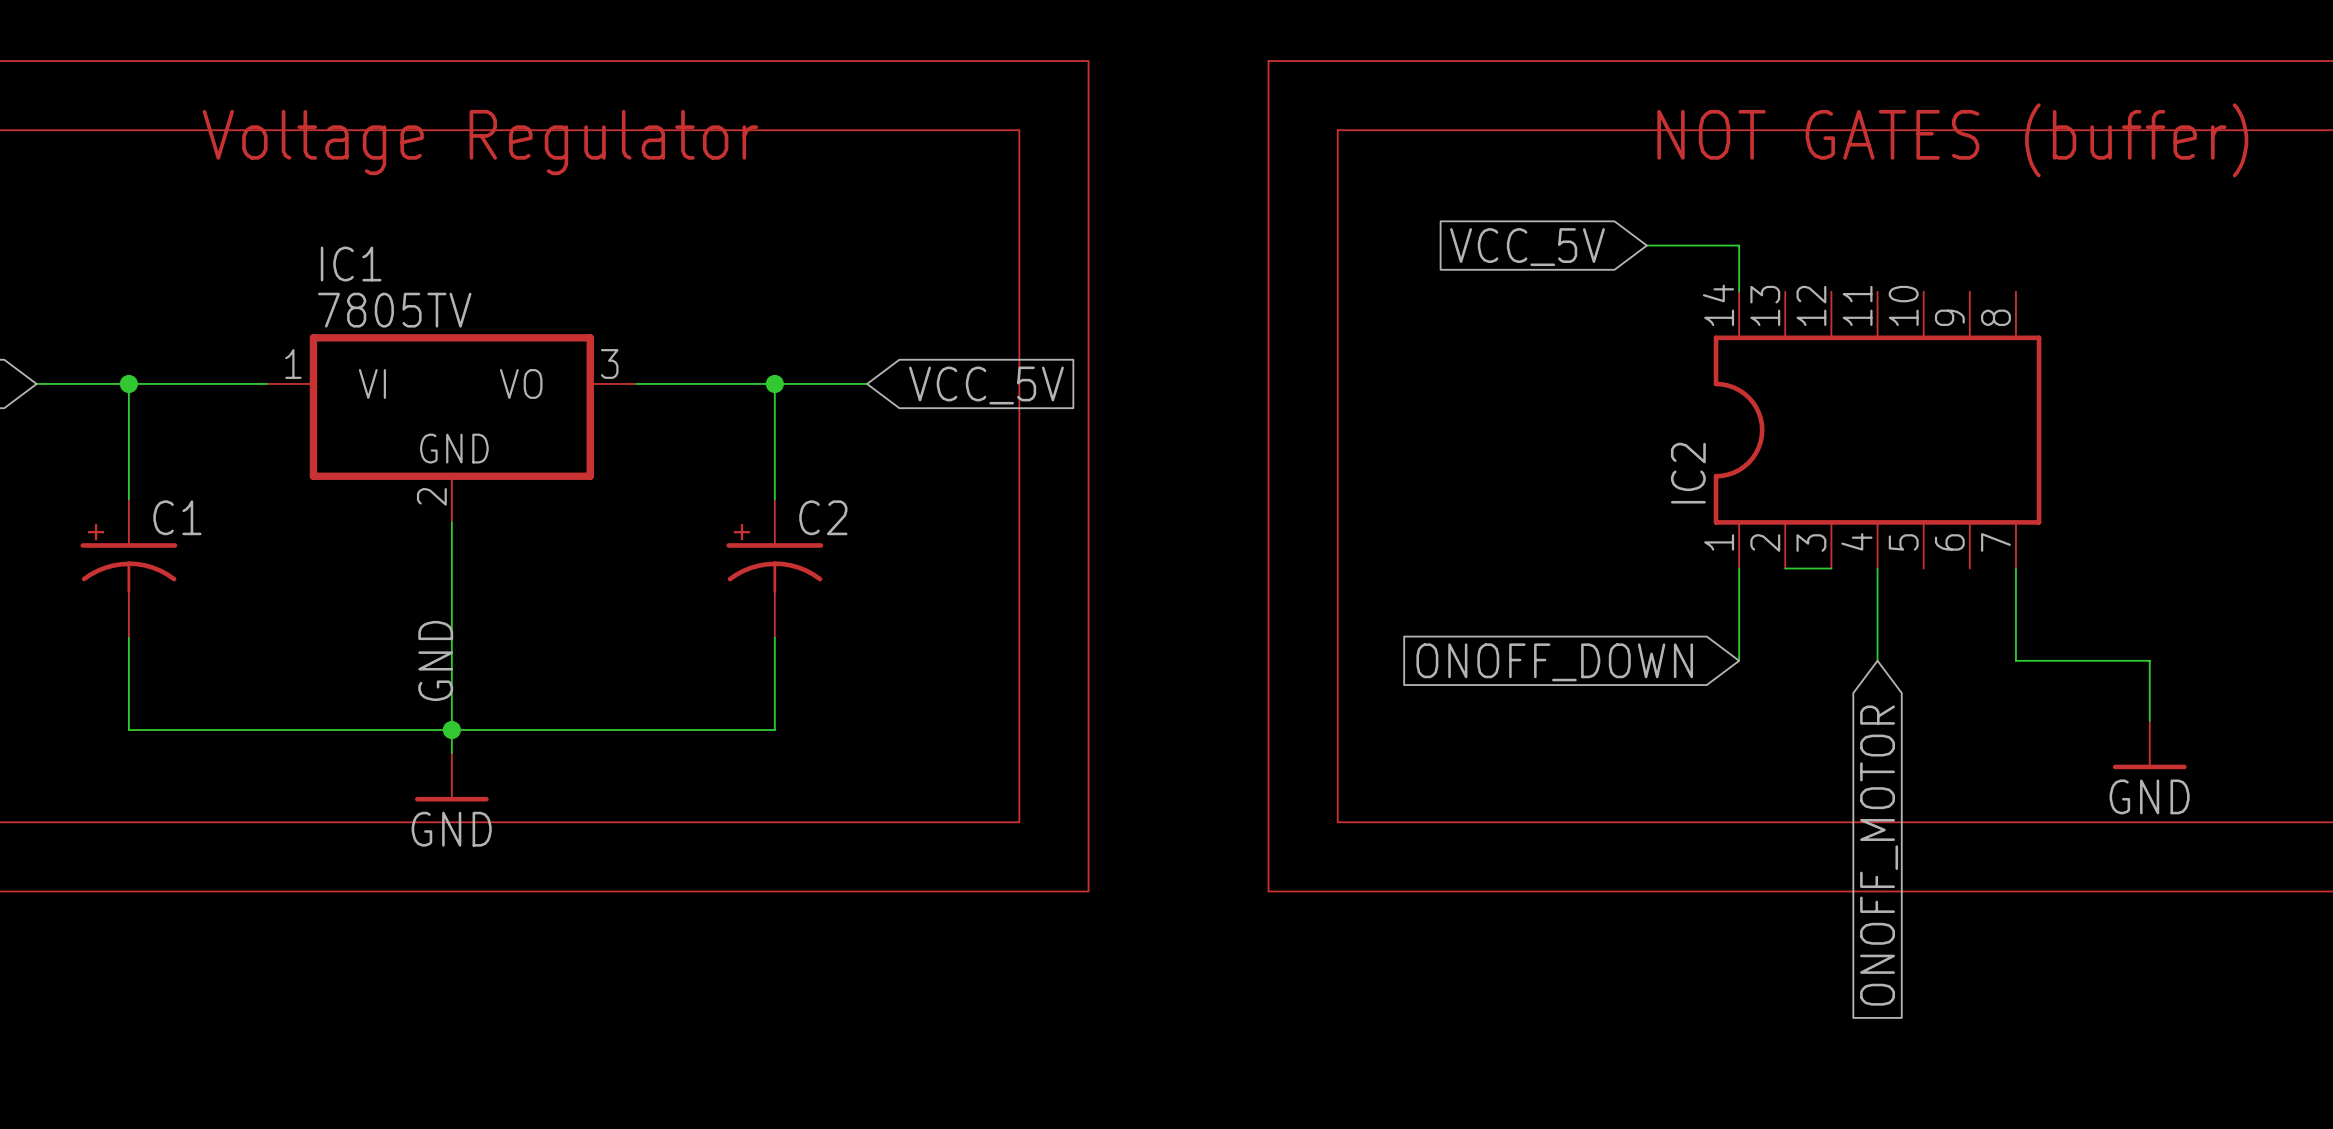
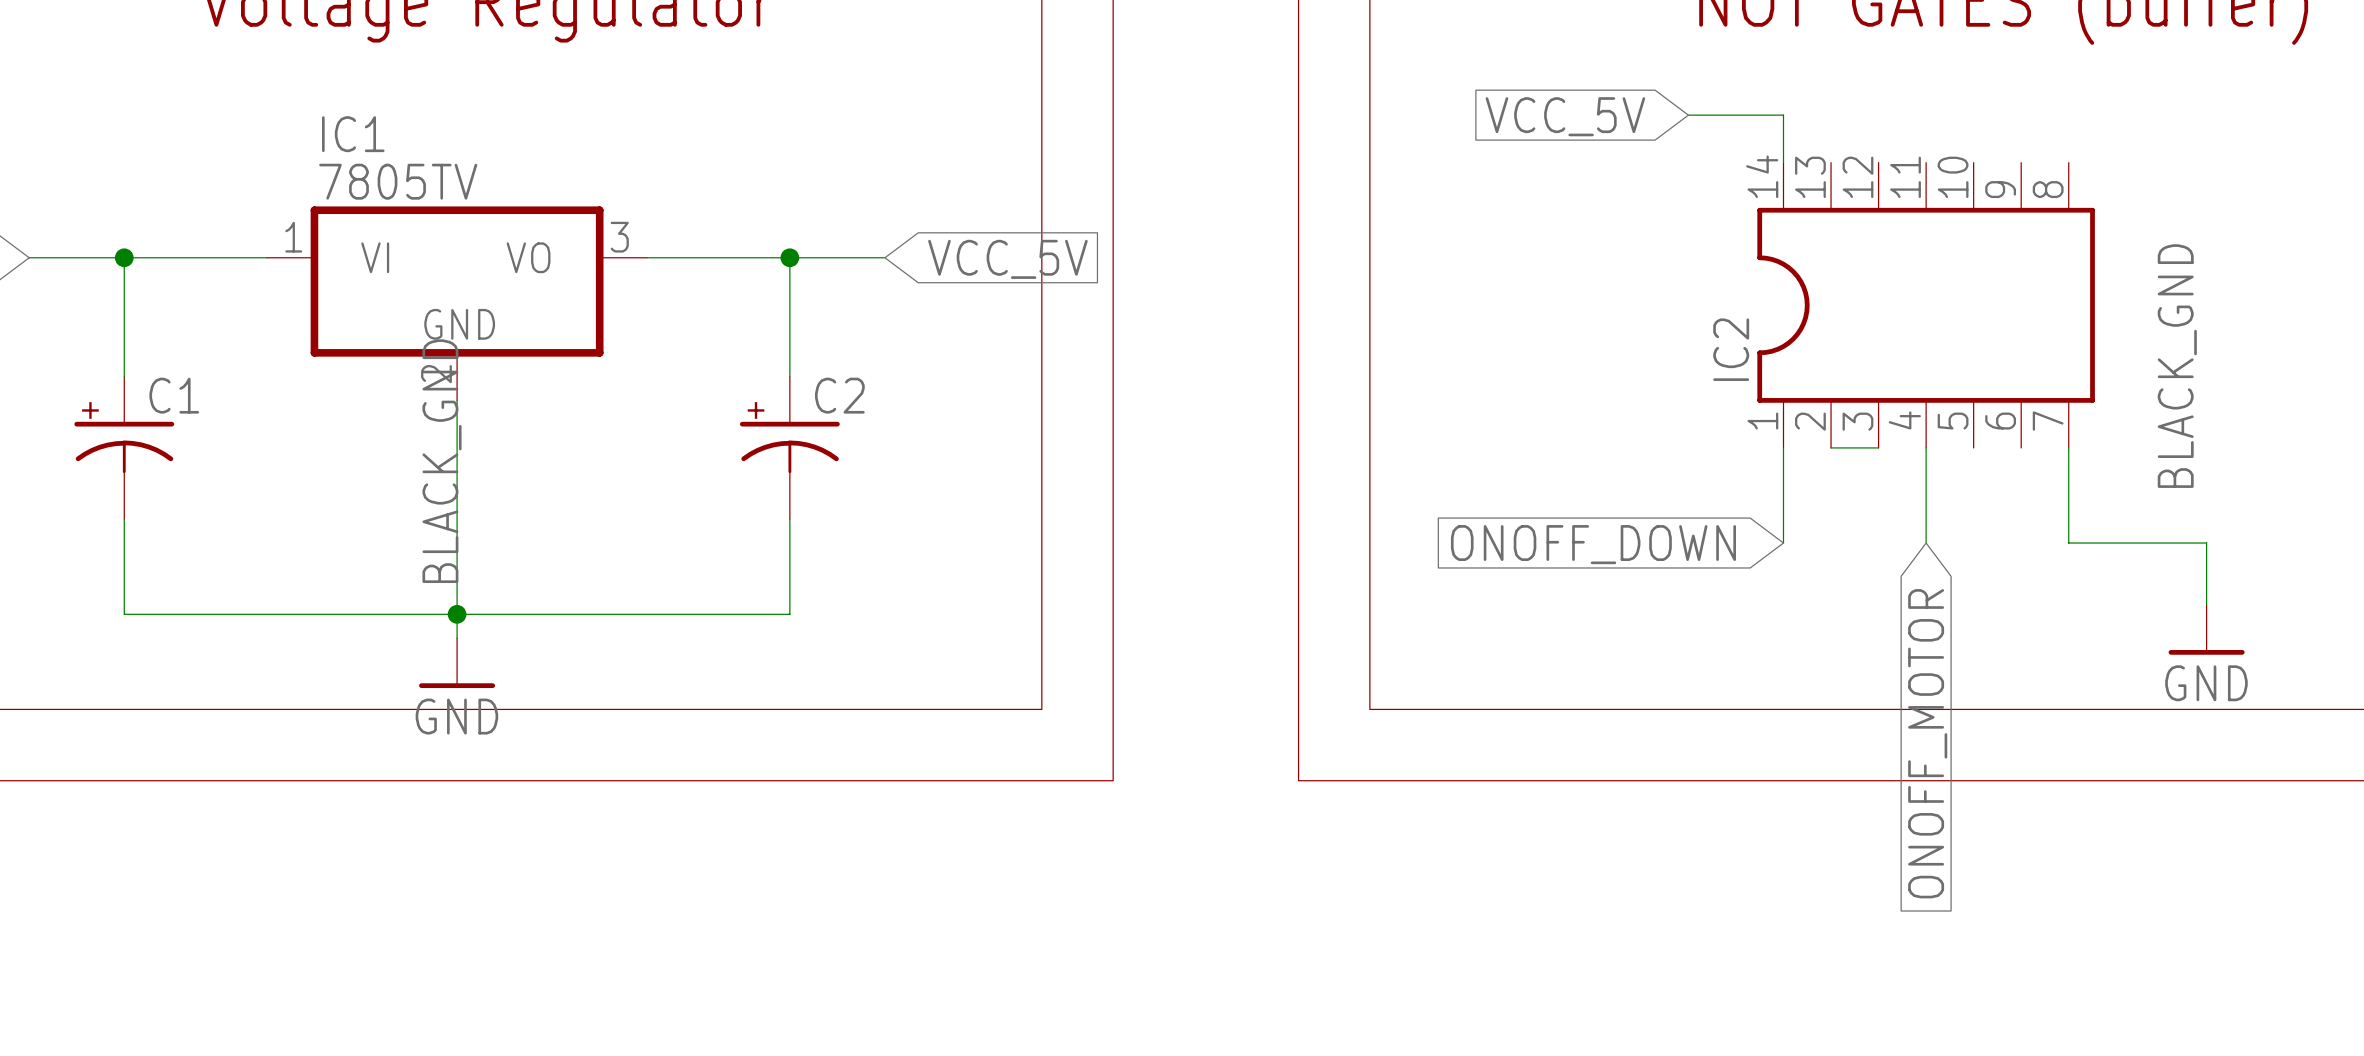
label: none -> BLACK_GND (2177, 366)
label: GND (435, 660) -> BLACK_GND (442, 461)

